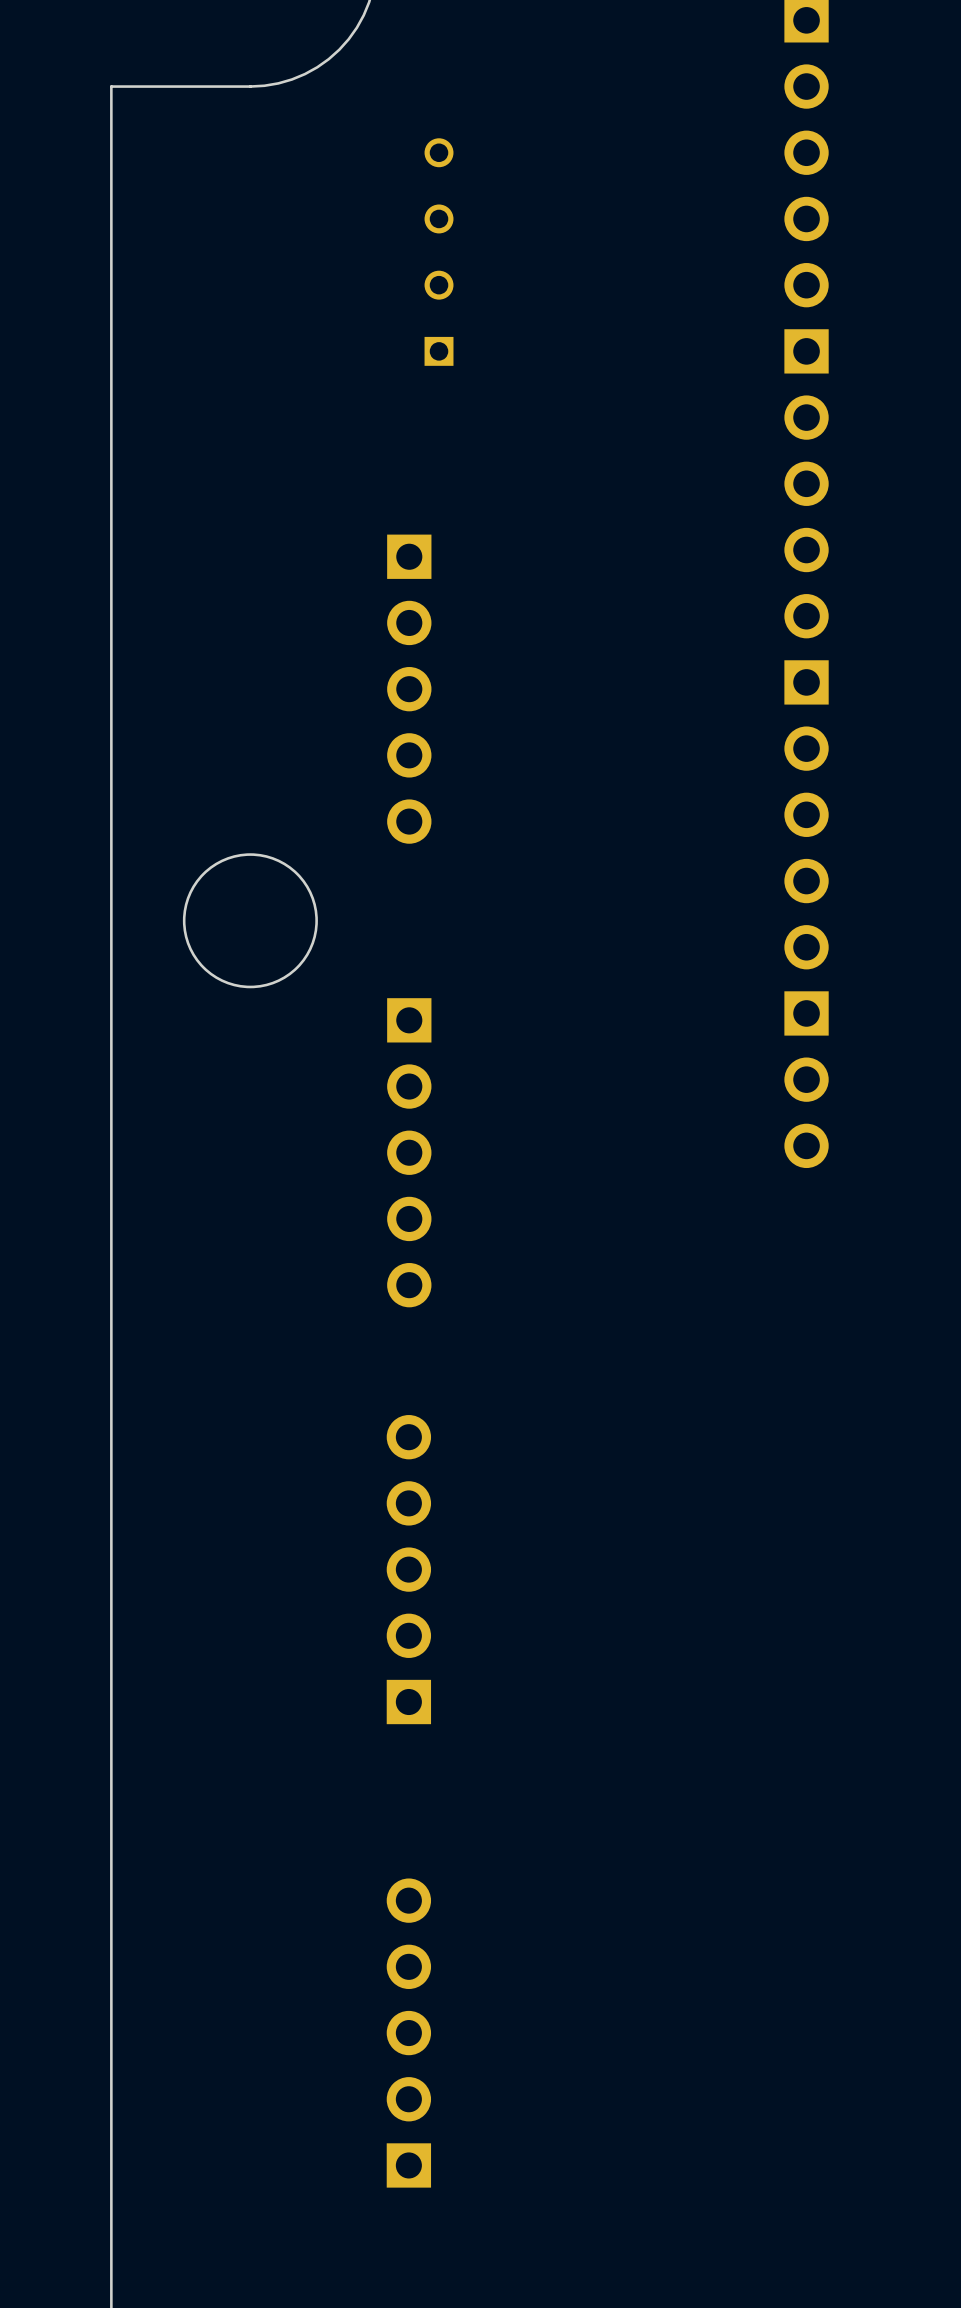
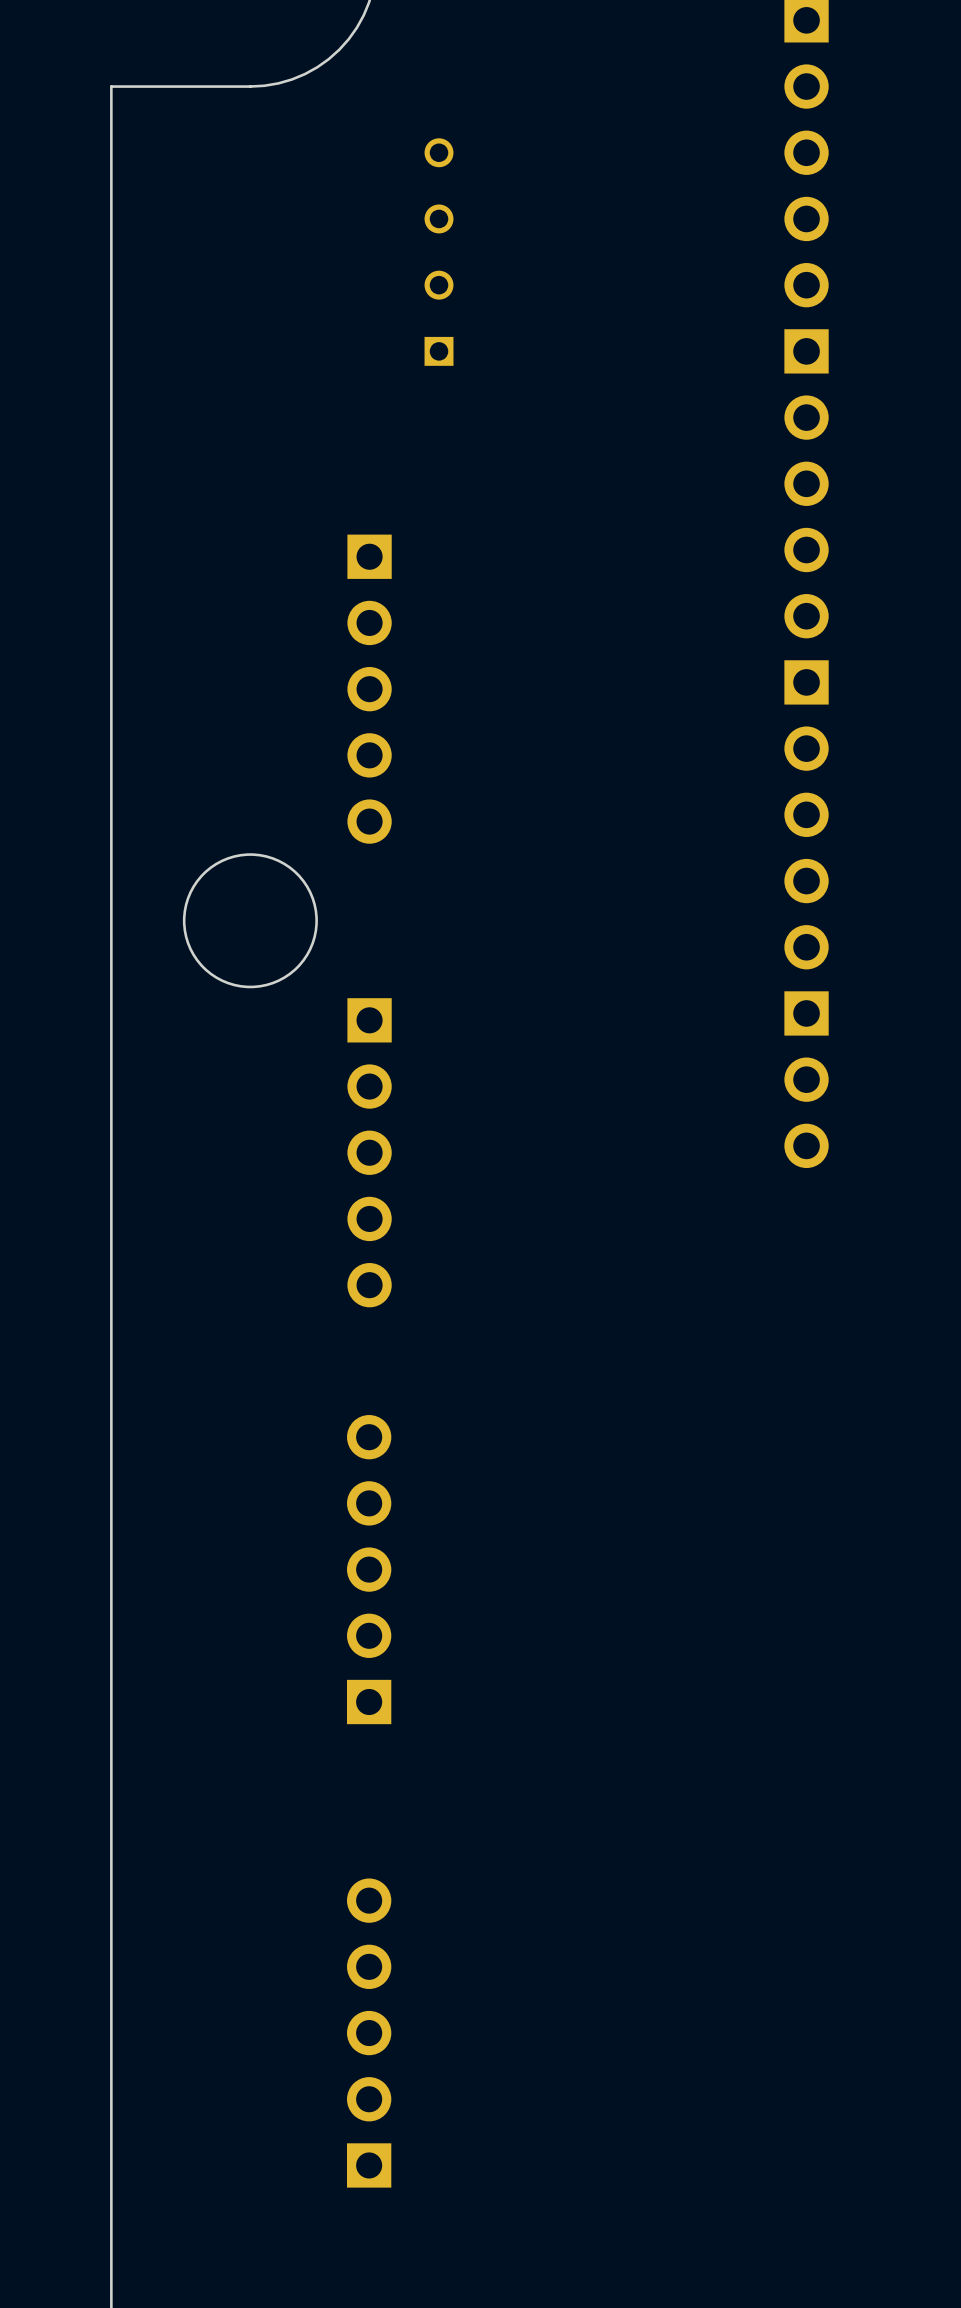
part position: (409, 689) -> (369, 689)
part position: (409, 1152) -> (369, 1152)
part position: (408, 1569) -> (369, 1569)
part position: (408, 2033) -> (369, 2033)

